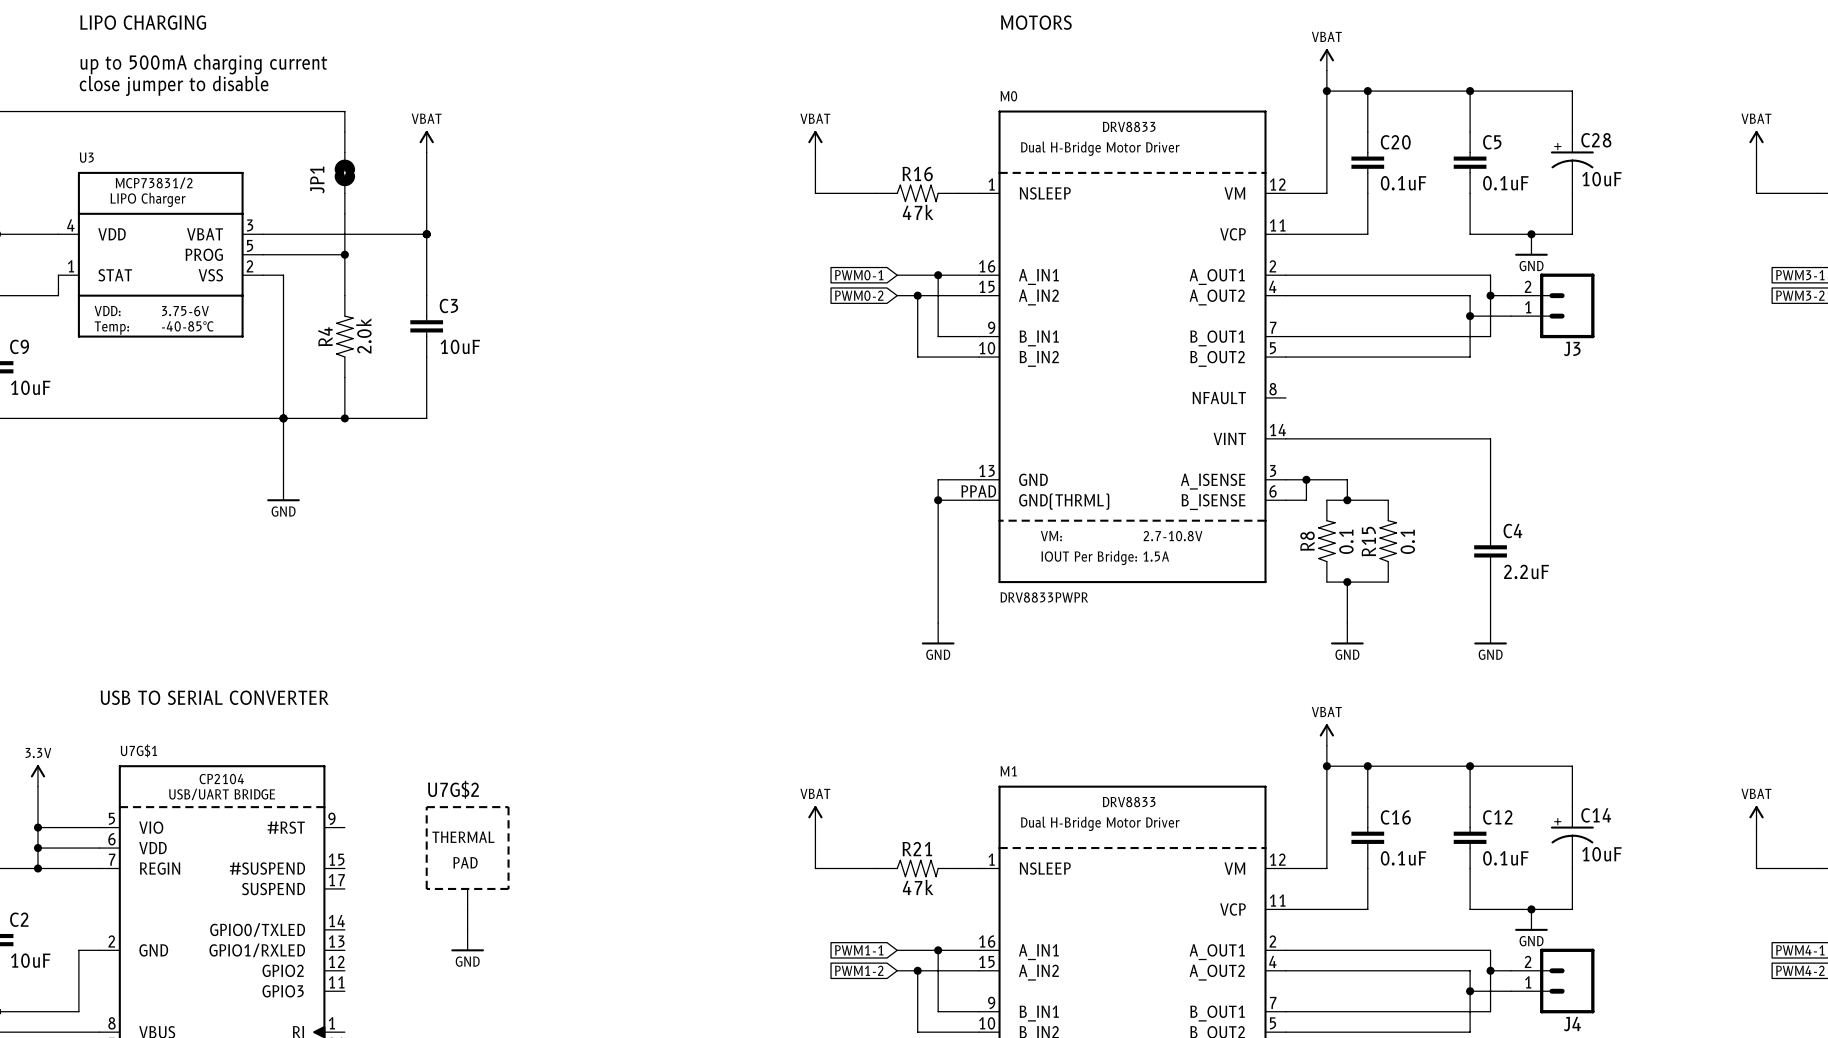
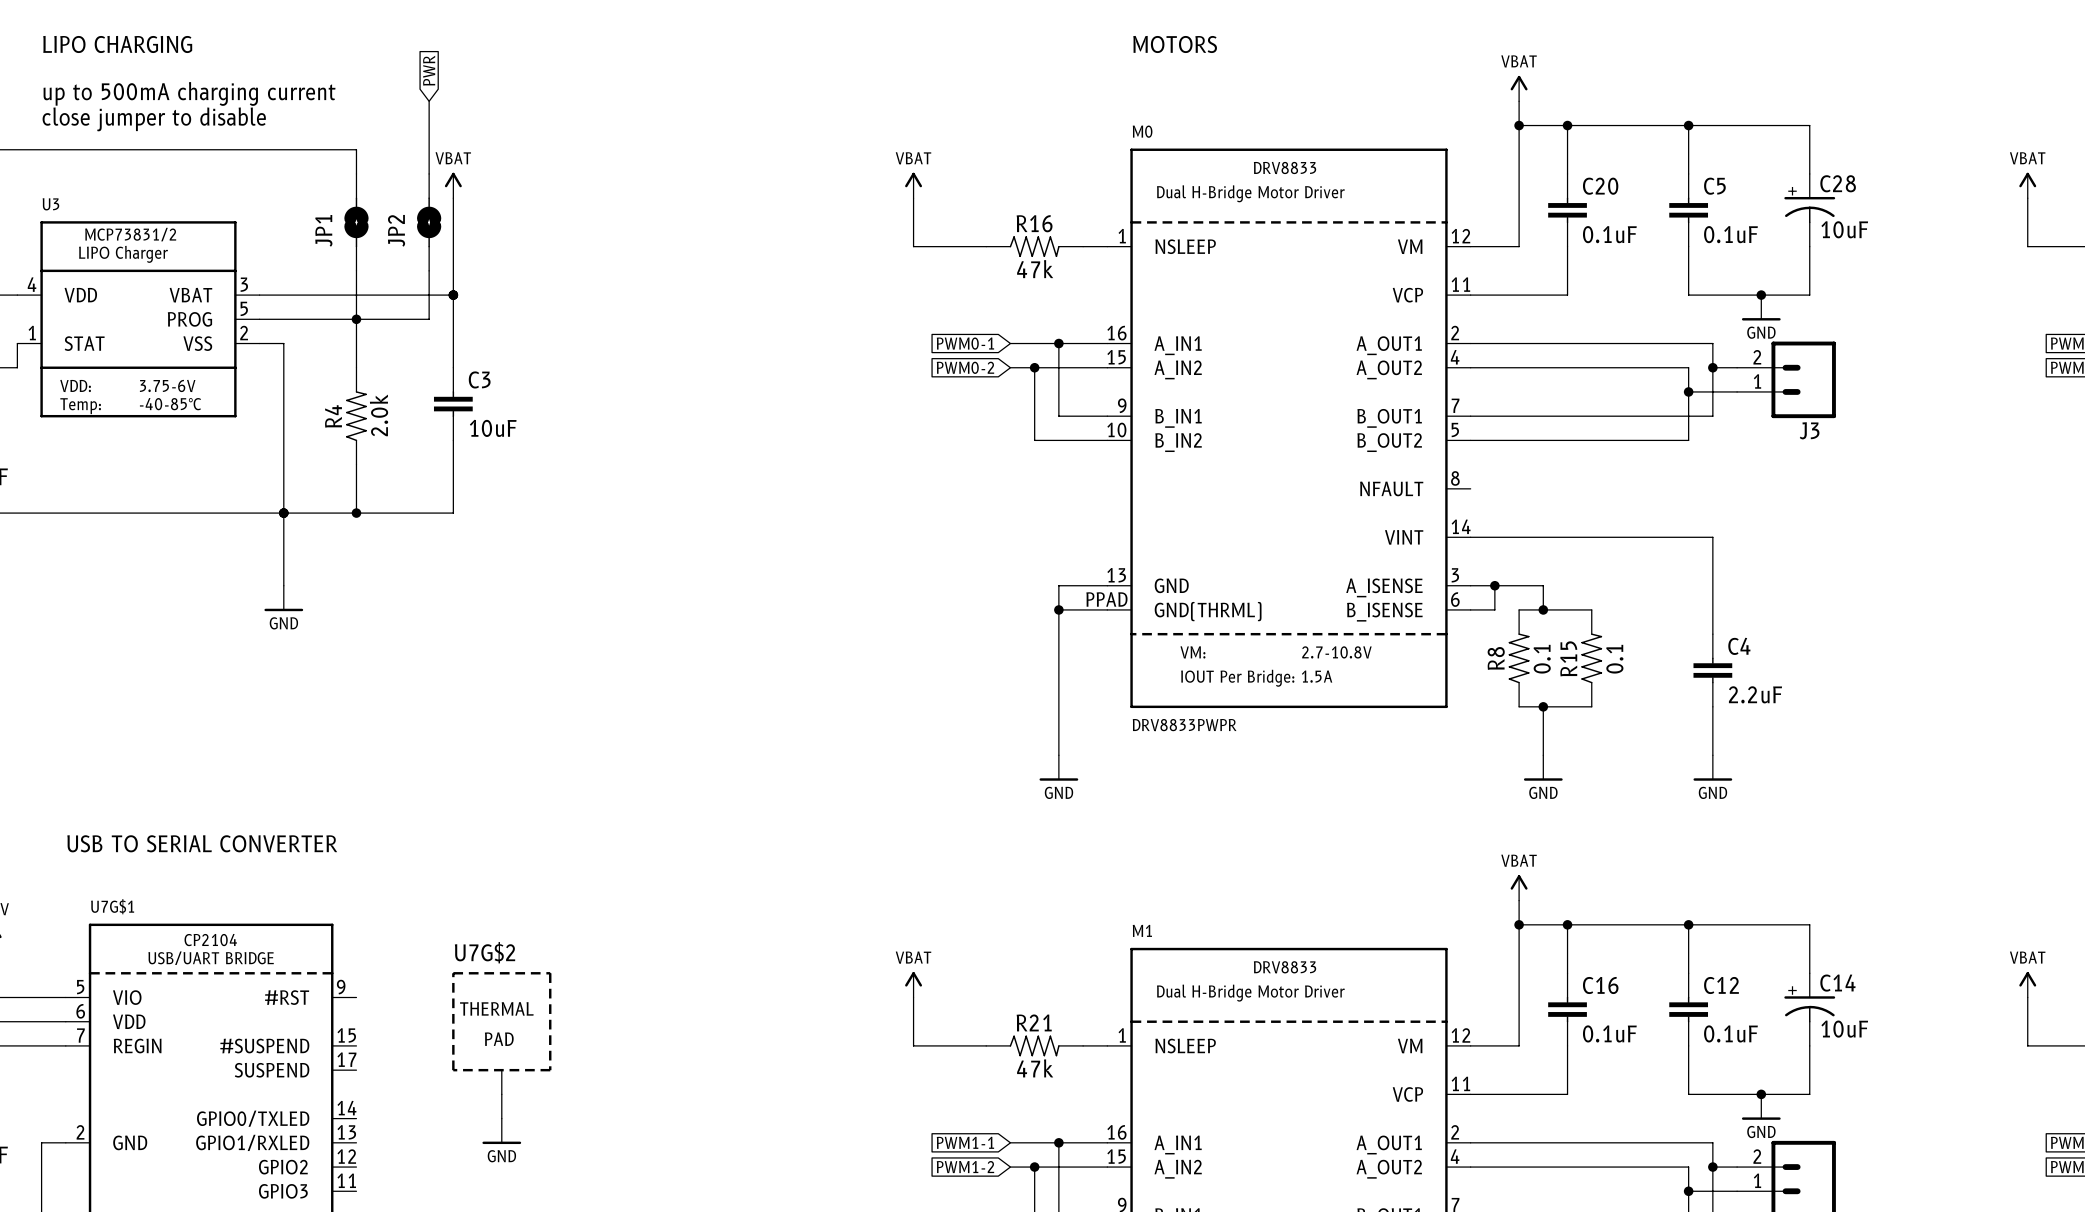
global label: none -> PWR (429, 70)
wire: none -> (429, 101) (429, 173)
JP2: none -> (429, 222)
wire: none -> (429, 270) (429, 319) (356, 319)

